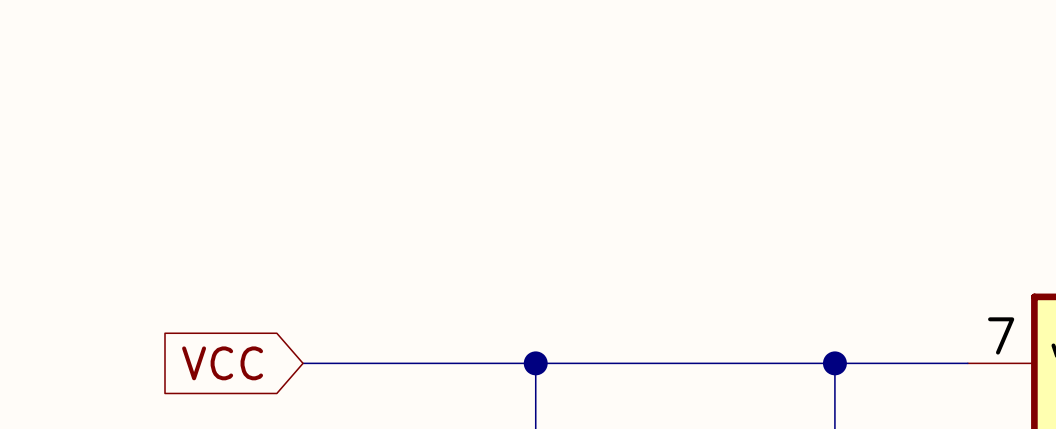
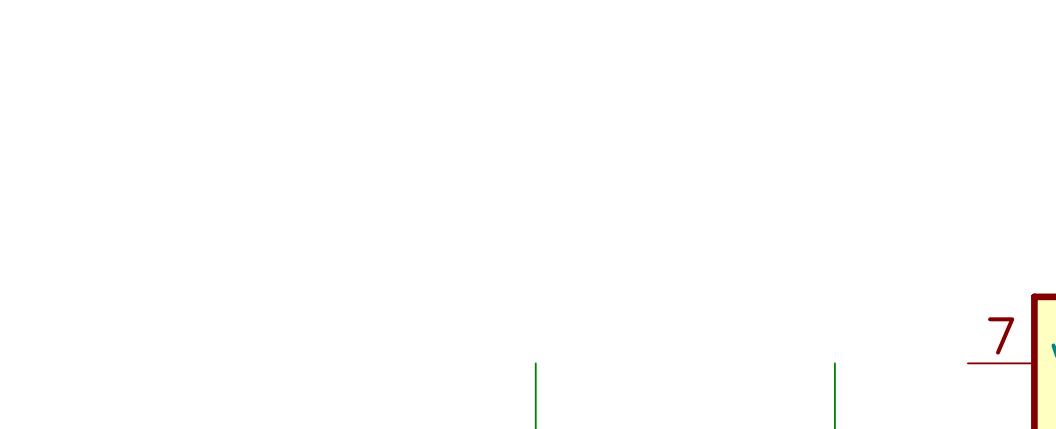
global label: VCC (222, 363) -> none
wire: (303, 363) (967, 363) -> none
junction: (535, 363) -> none
junction: (834, 363) -> none

